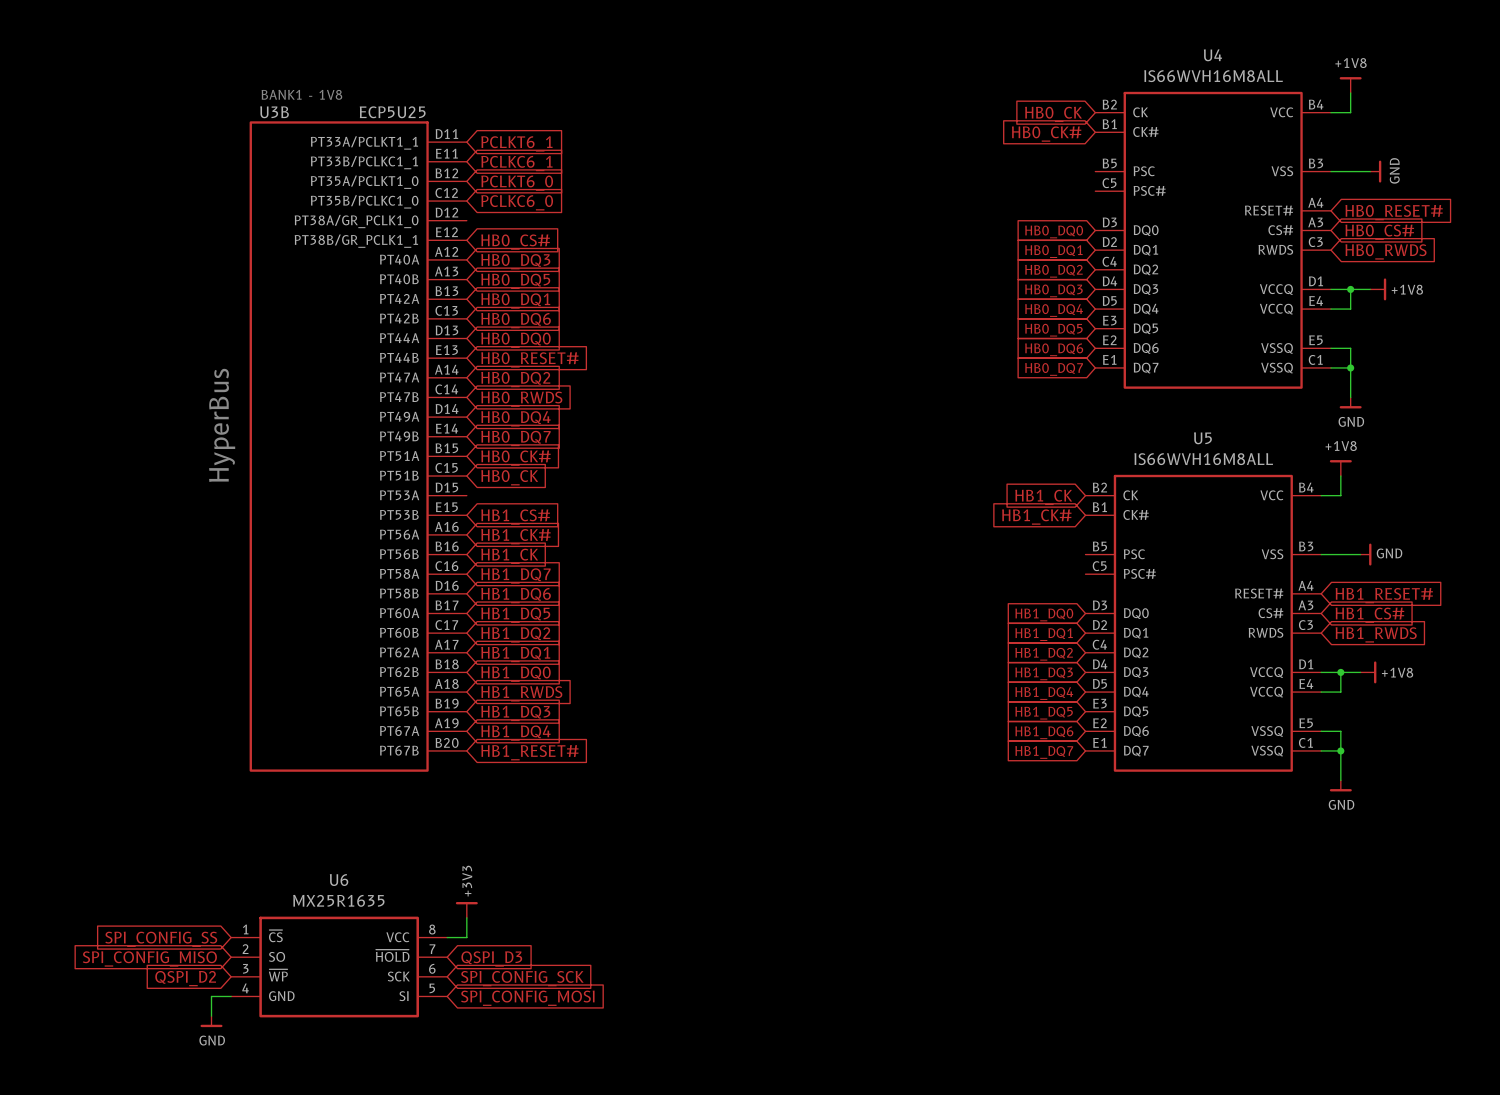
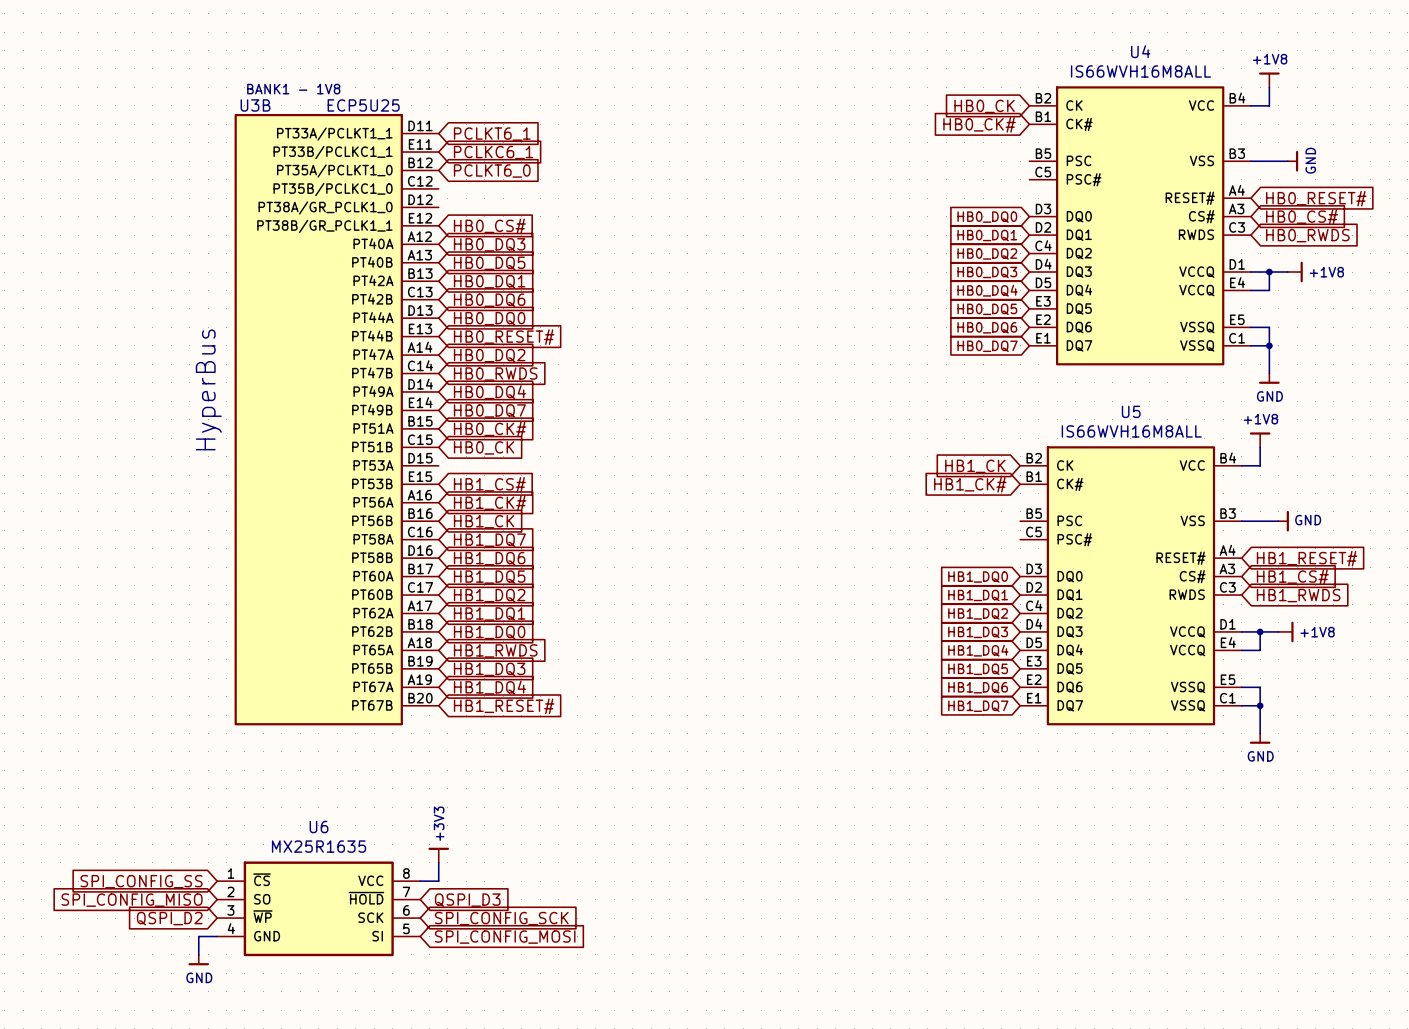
global label: PCLKC6_0 (517, 202) -> none

